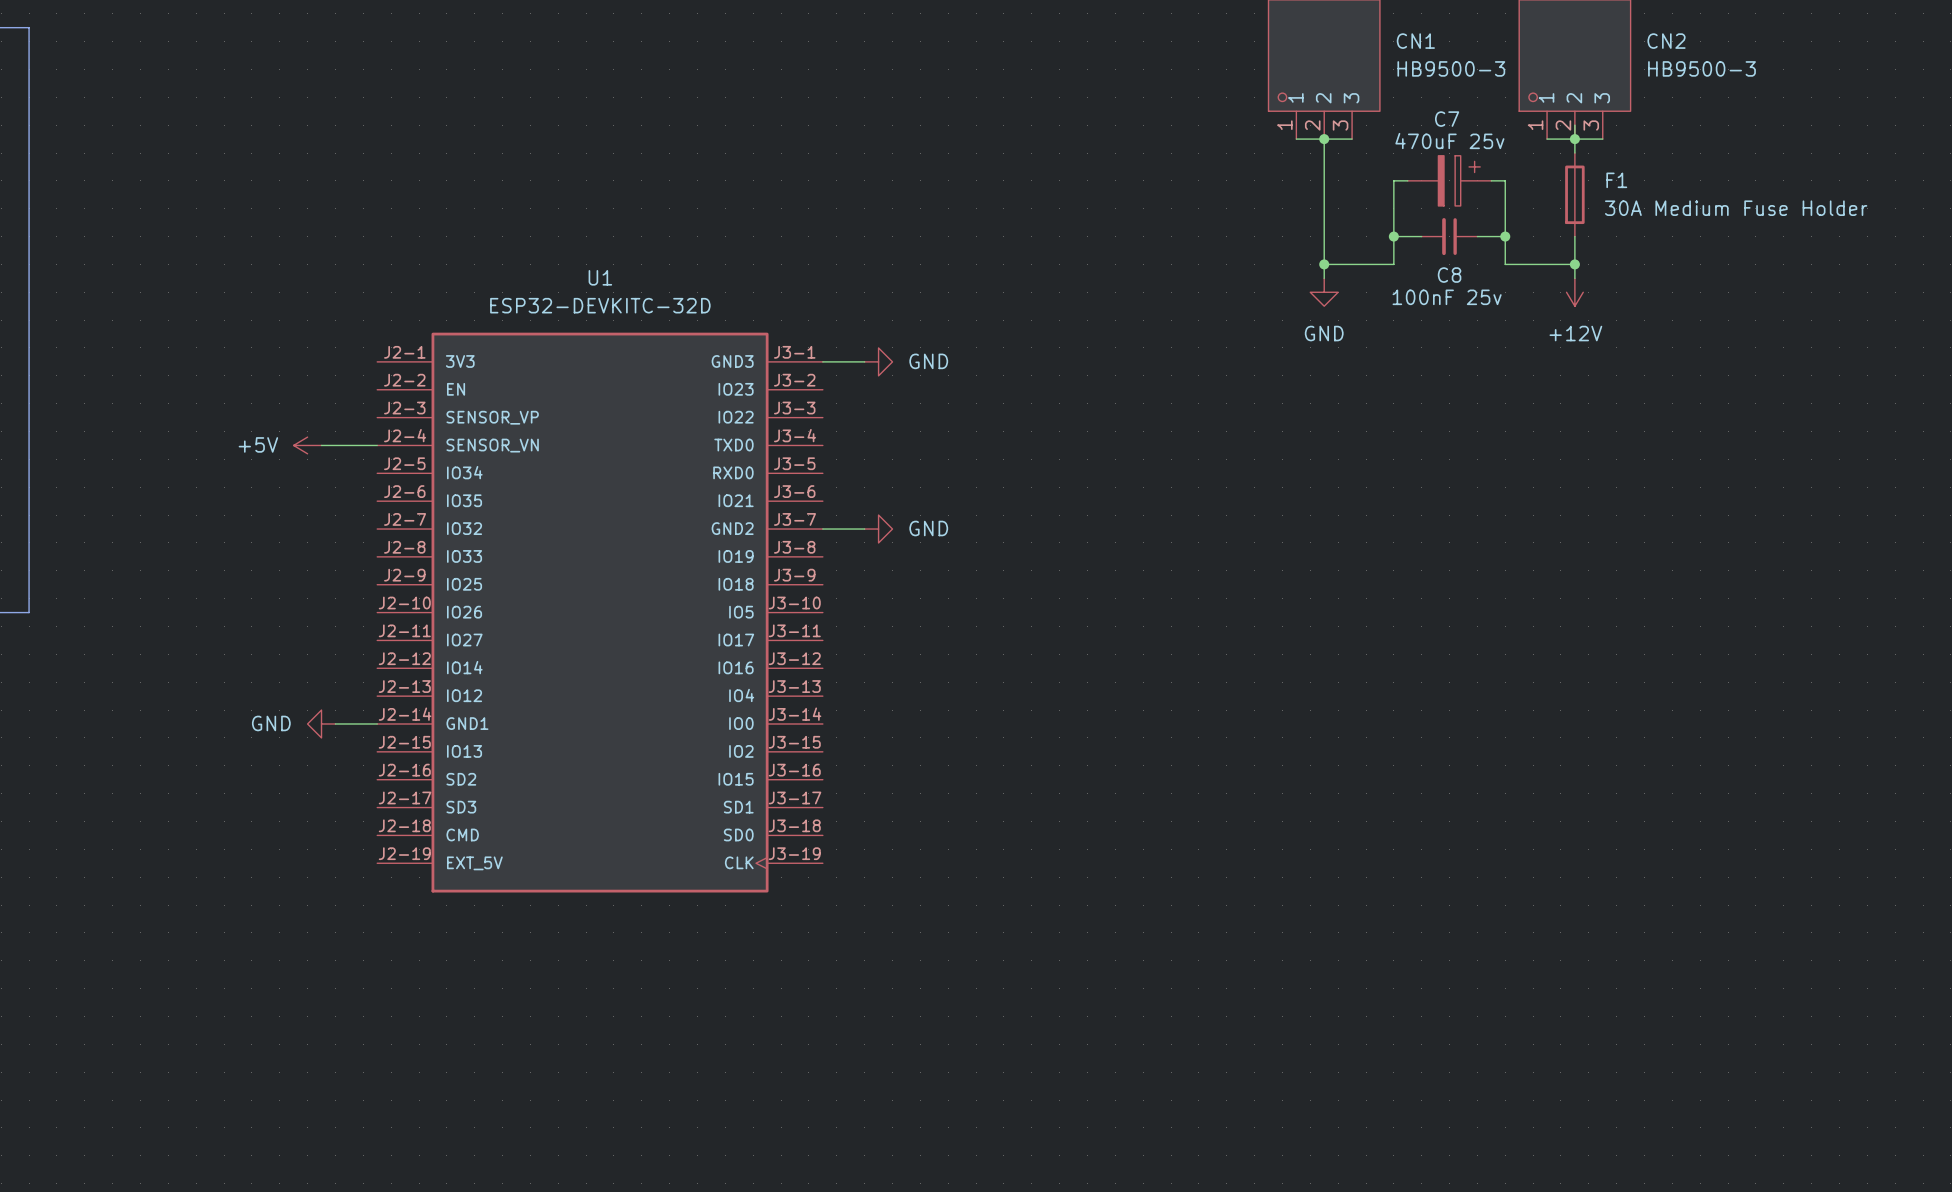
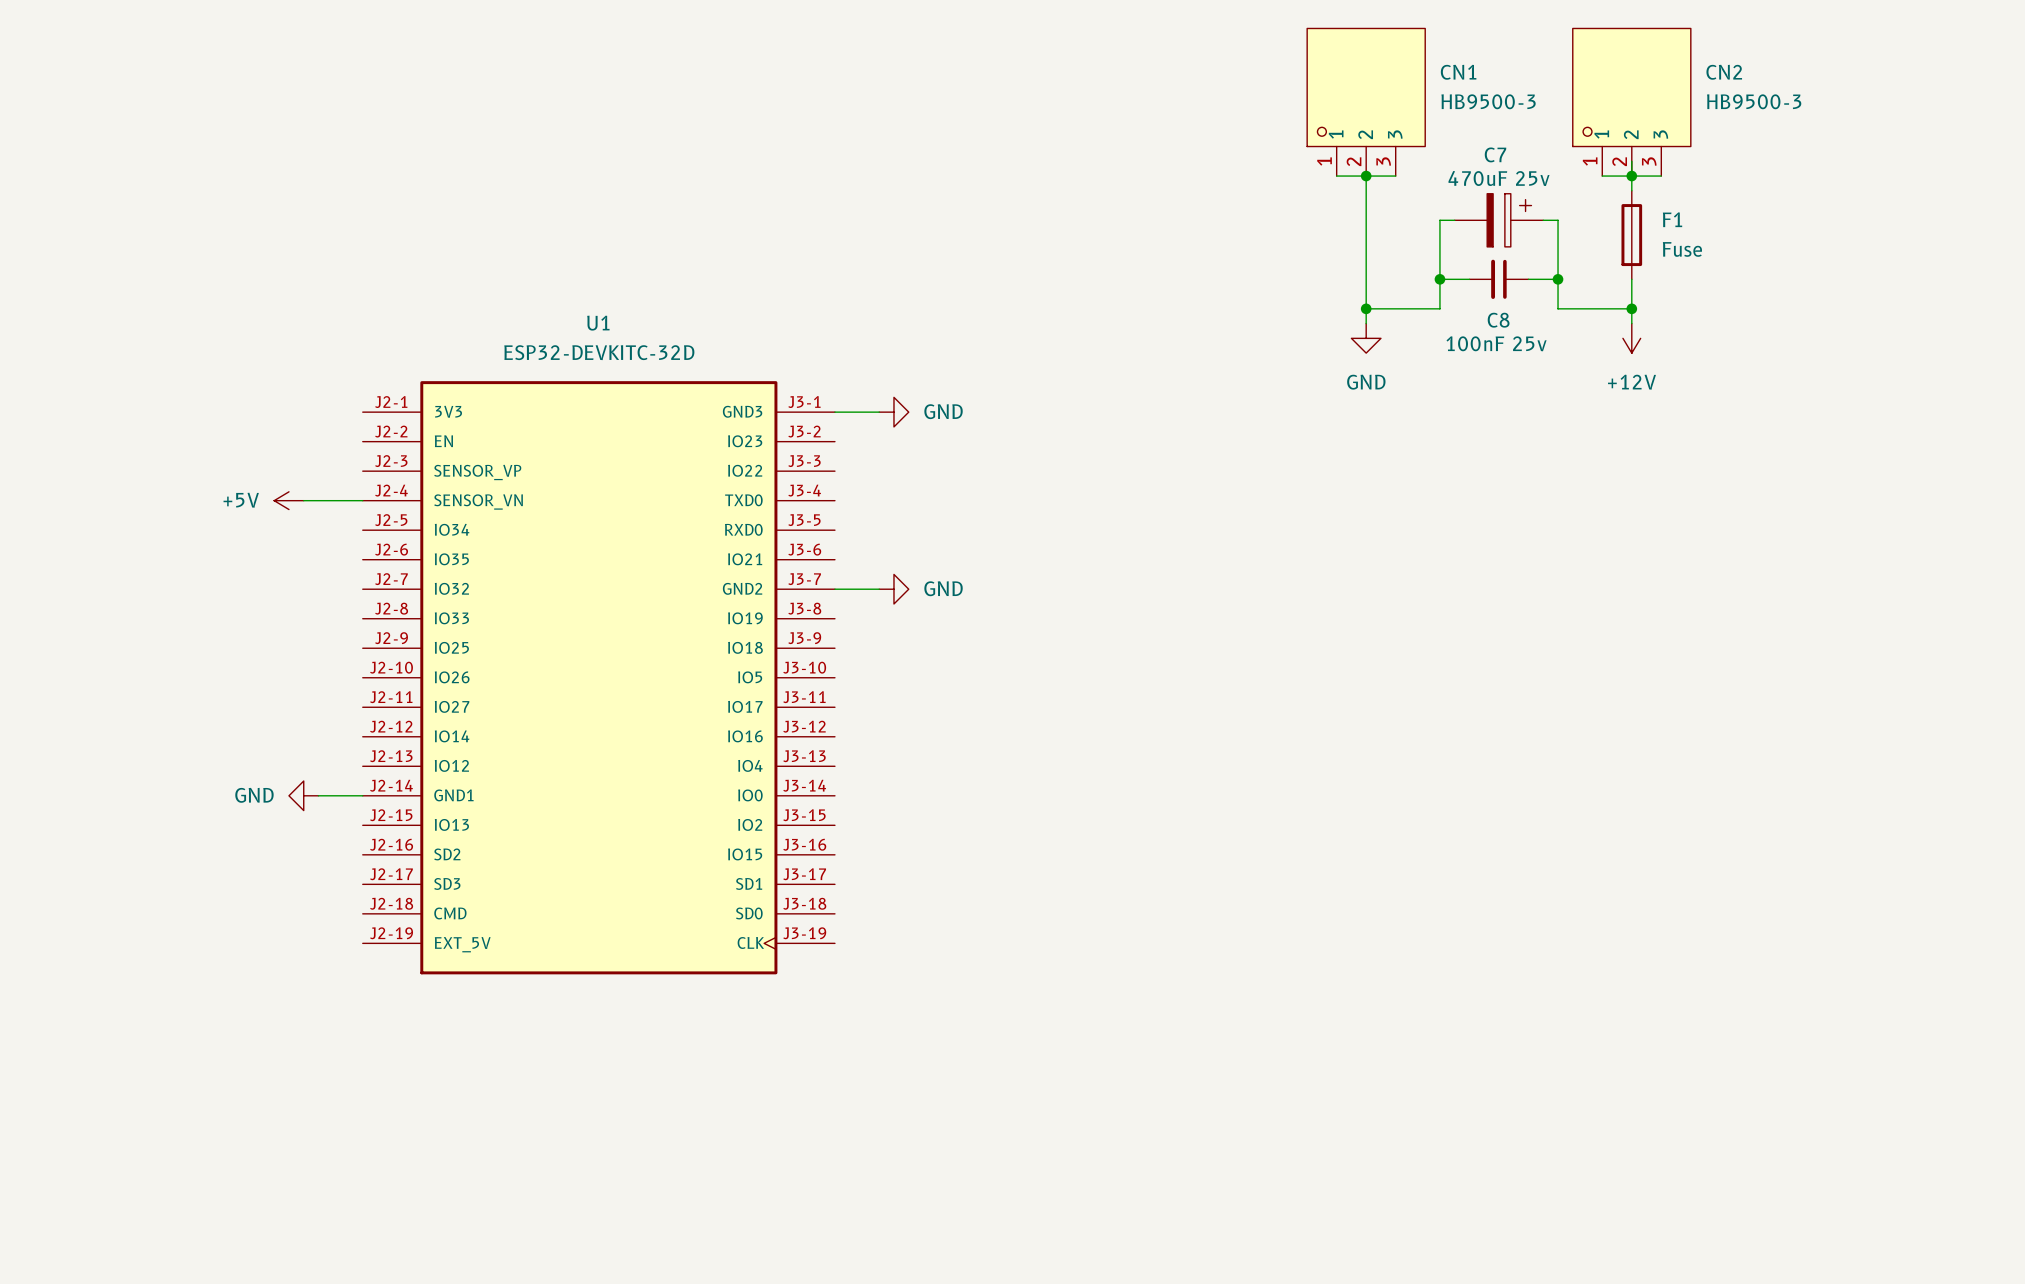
F1 value: 30A Medium Fuse Holder (1736, 208) -> Fuse (1682, 249)

